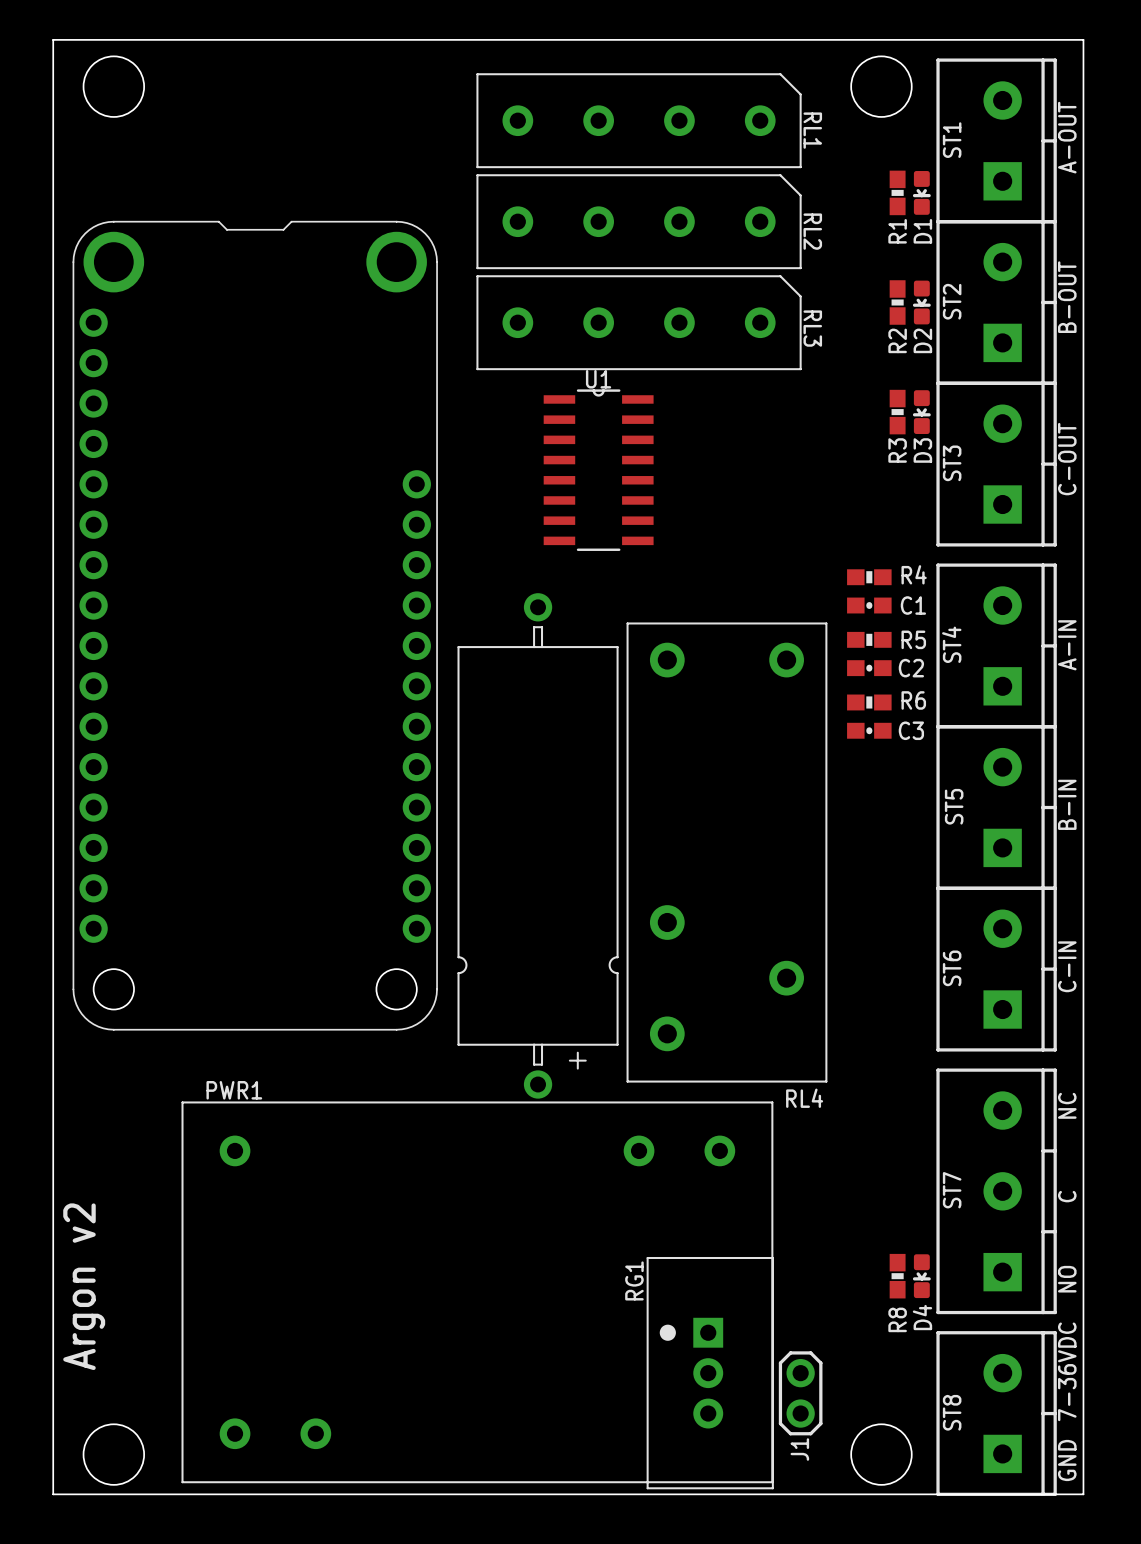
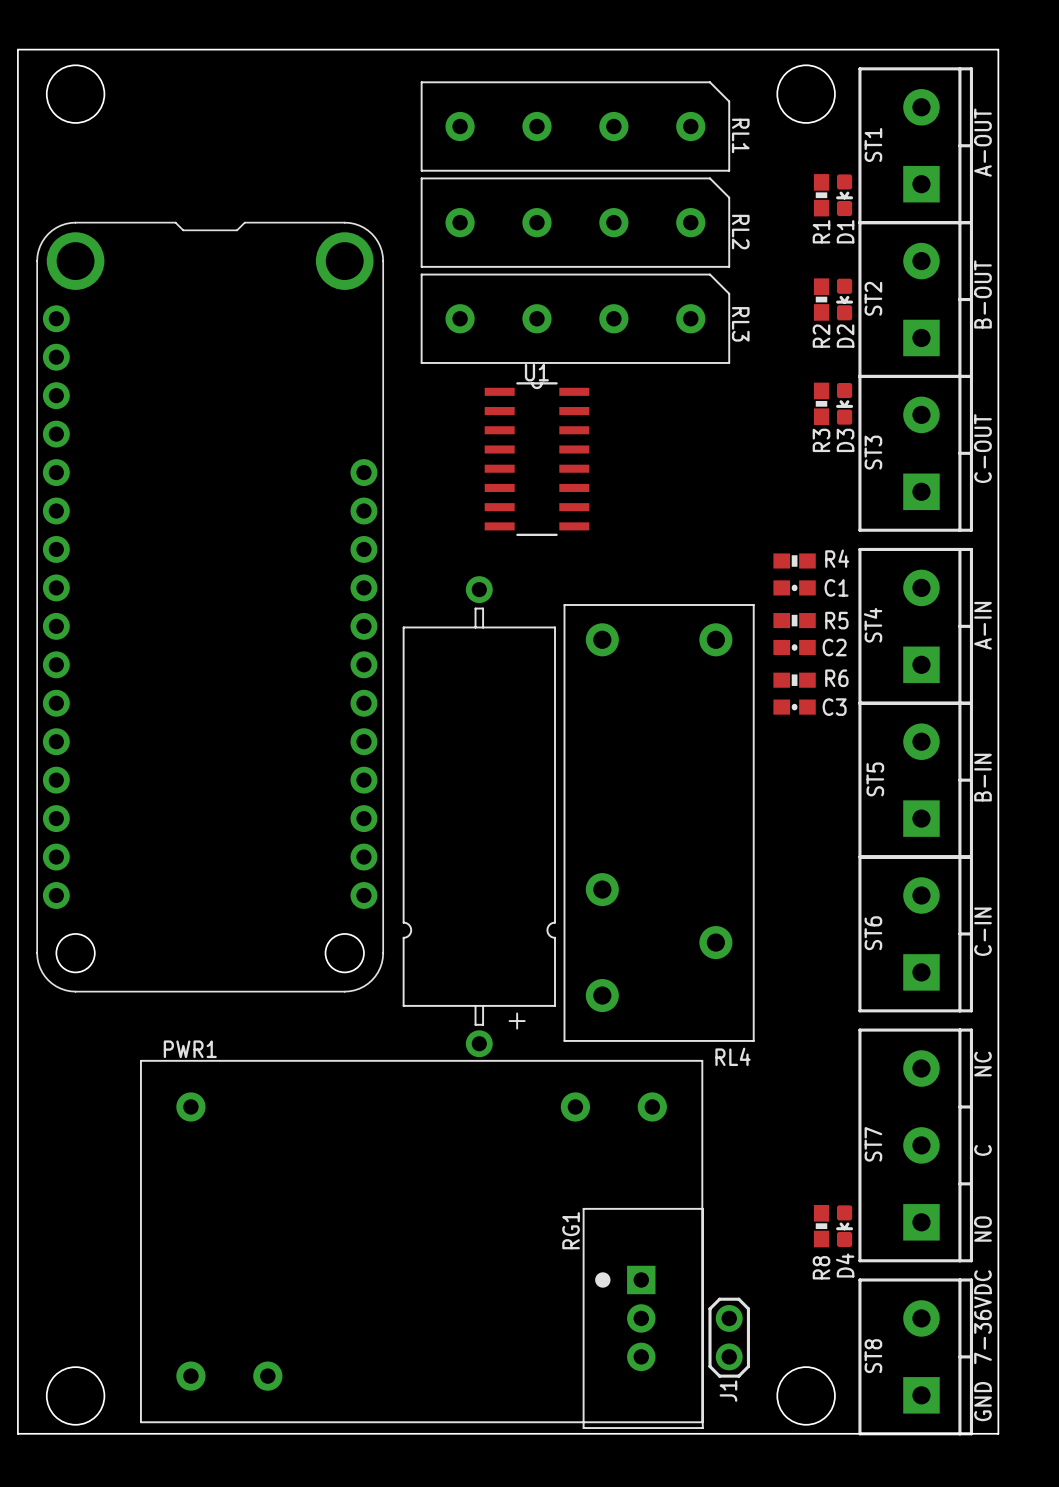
text: Argon v2 (84, 1286) -> none

